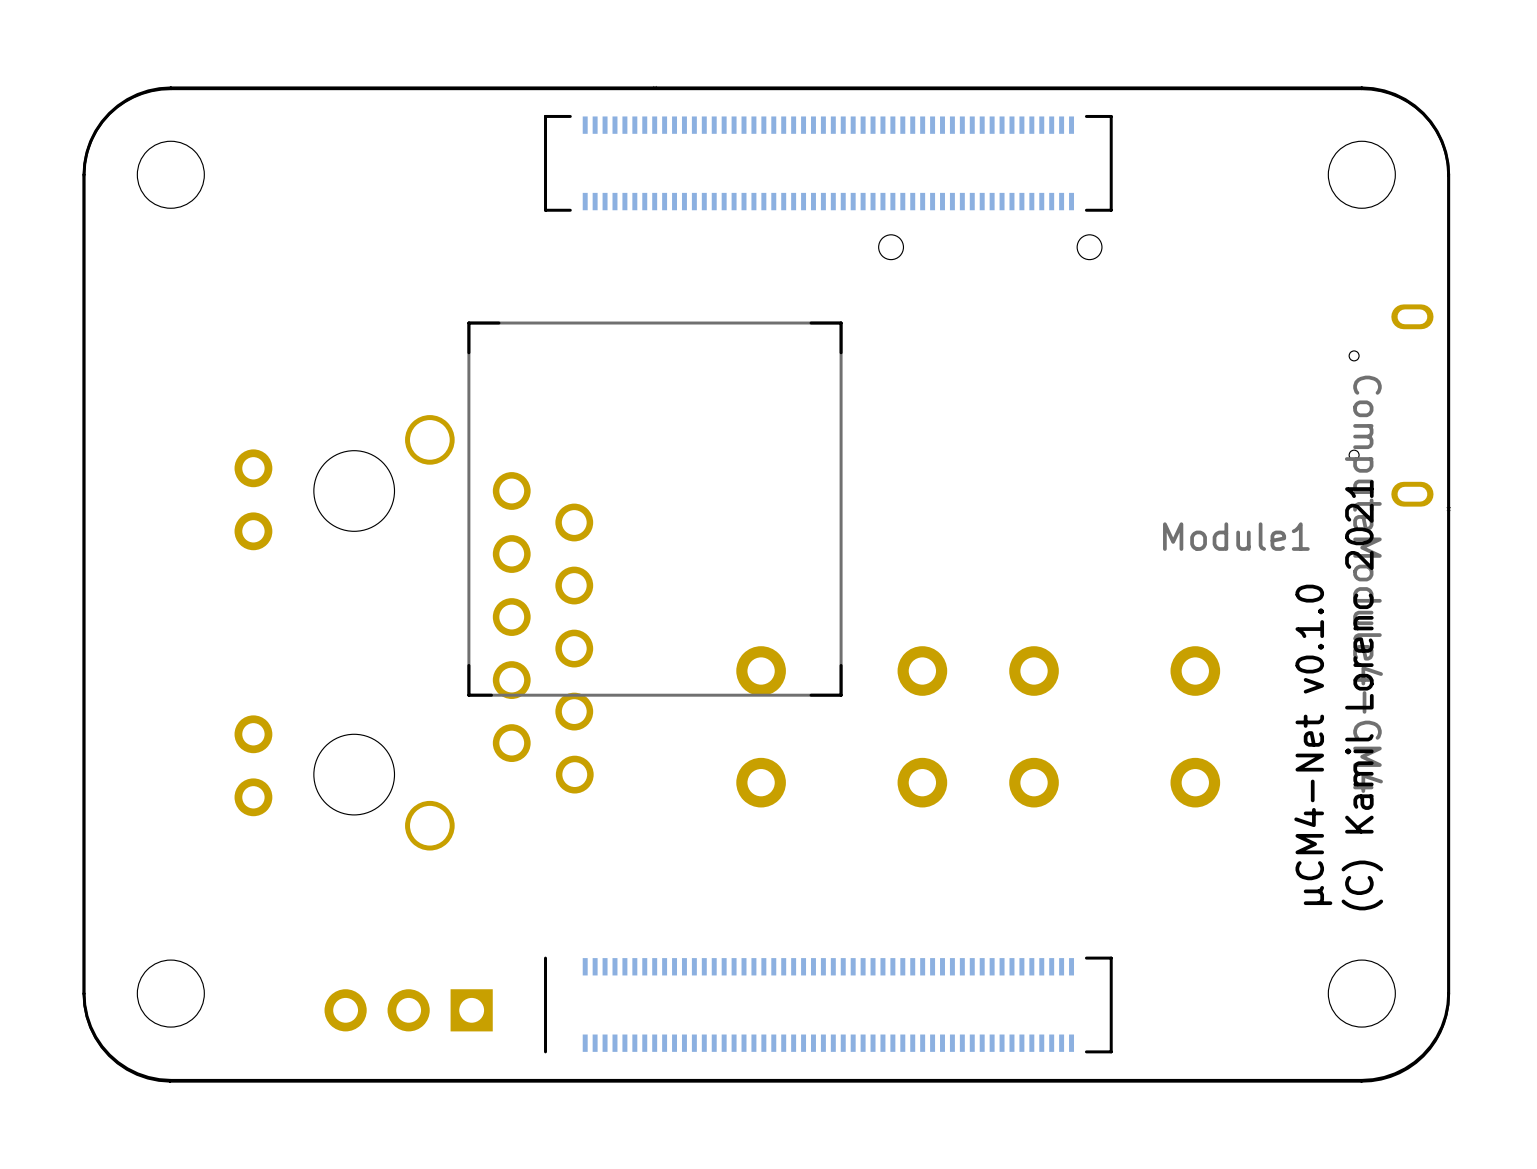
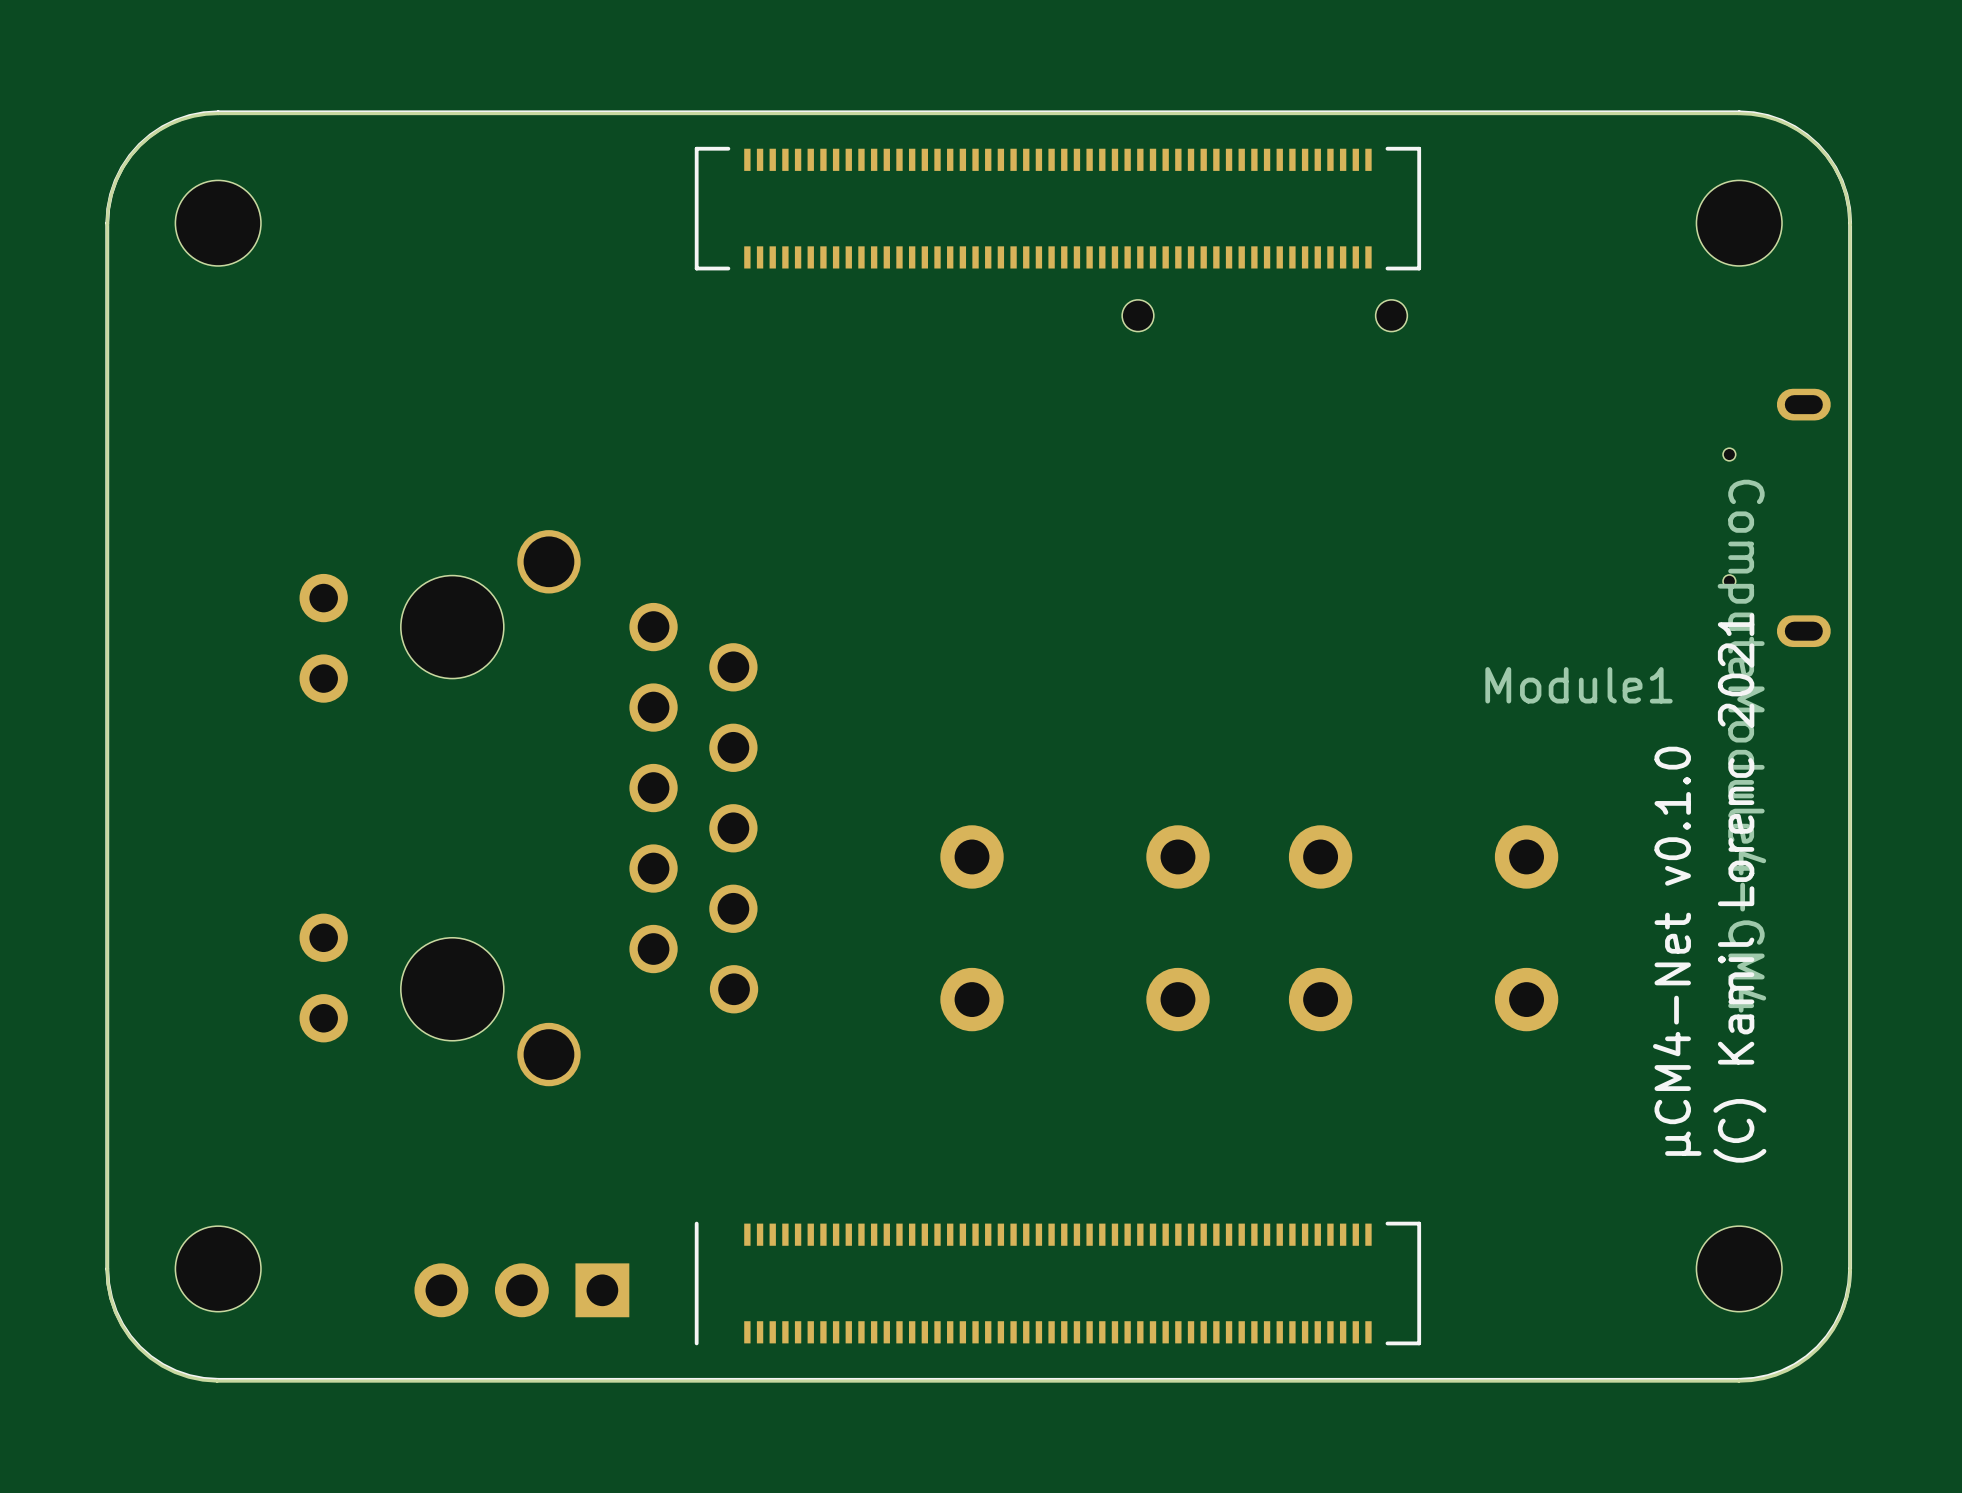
Module1 footprint: [82, 86, 1451, 1082] -> [105, 110, 1853, 1382]

